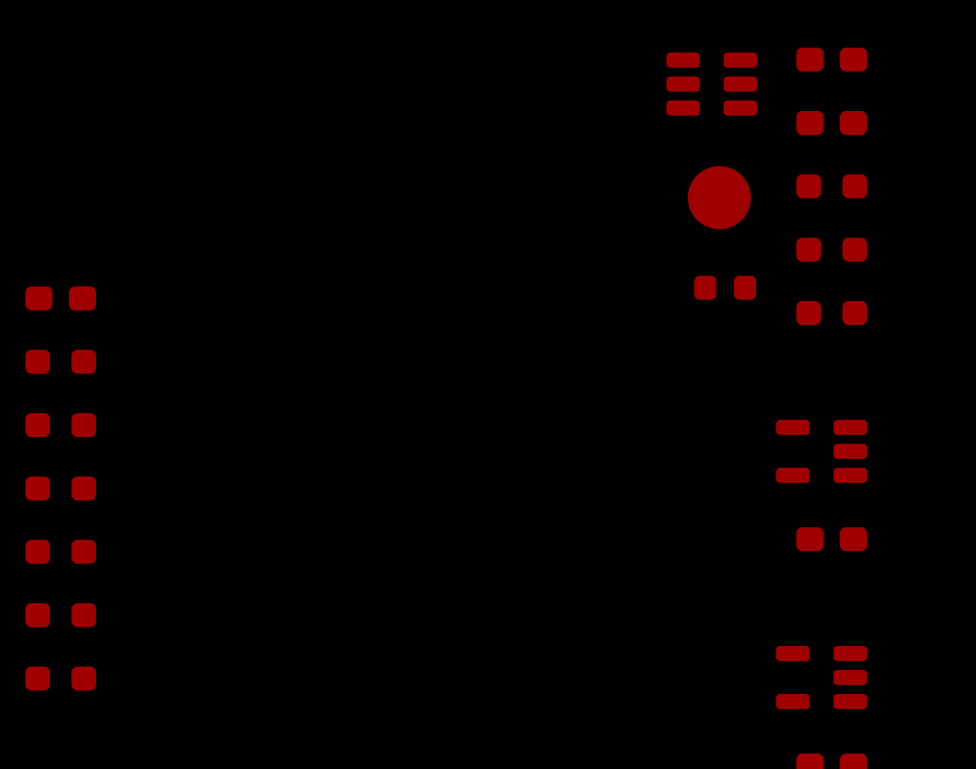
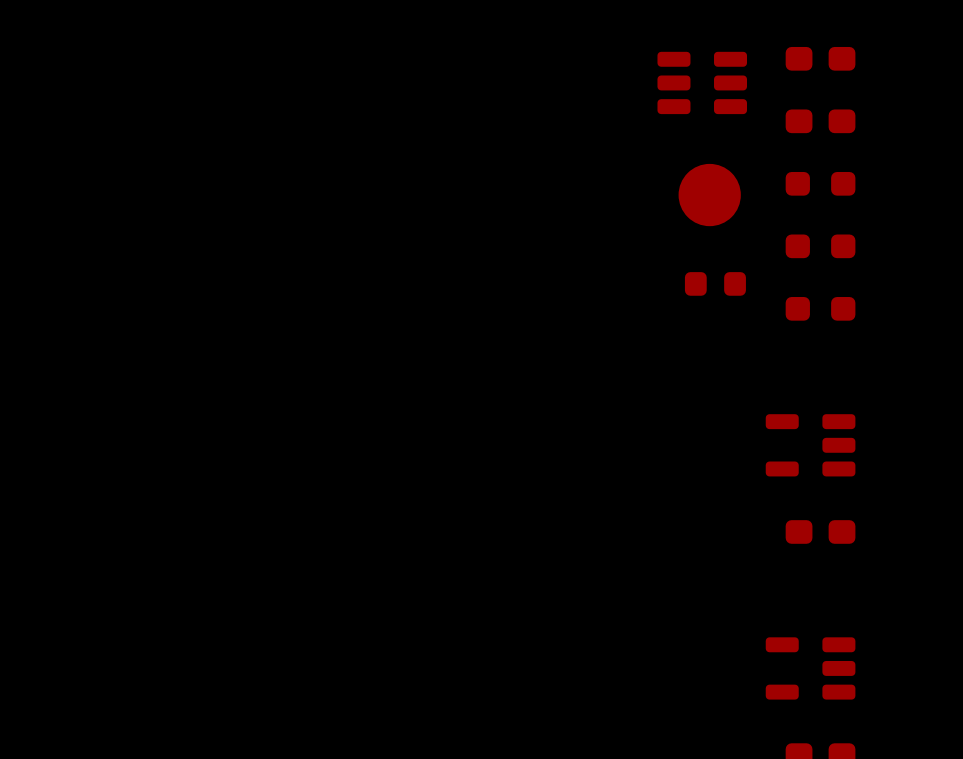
part: (60, 298) -> none
part: (60, 361) -> none
part: (60, 425) -> none
part: (60, 488) -> none
part: (60, 551) -> none
part: (60, 615) -> none
part: (60, 678) -> none

